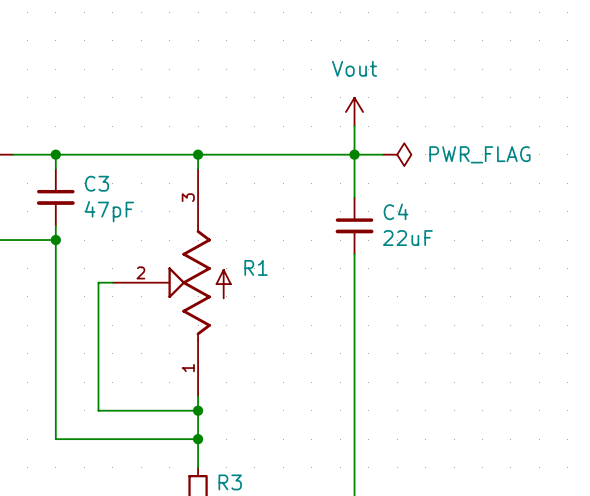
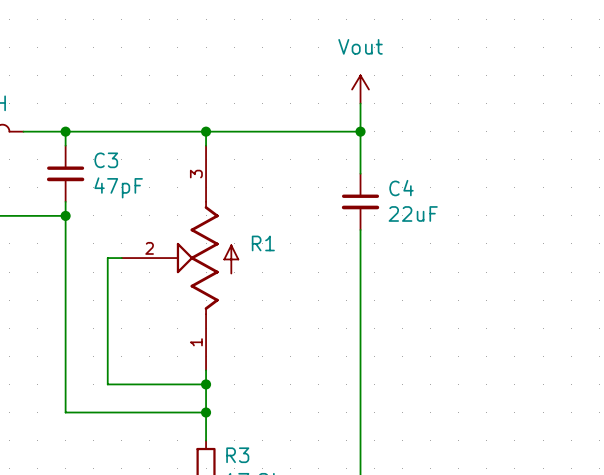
wire: (354, 154) (382, 154) -> none
power symbol: PWR_FLAG (397, 154) -> none

